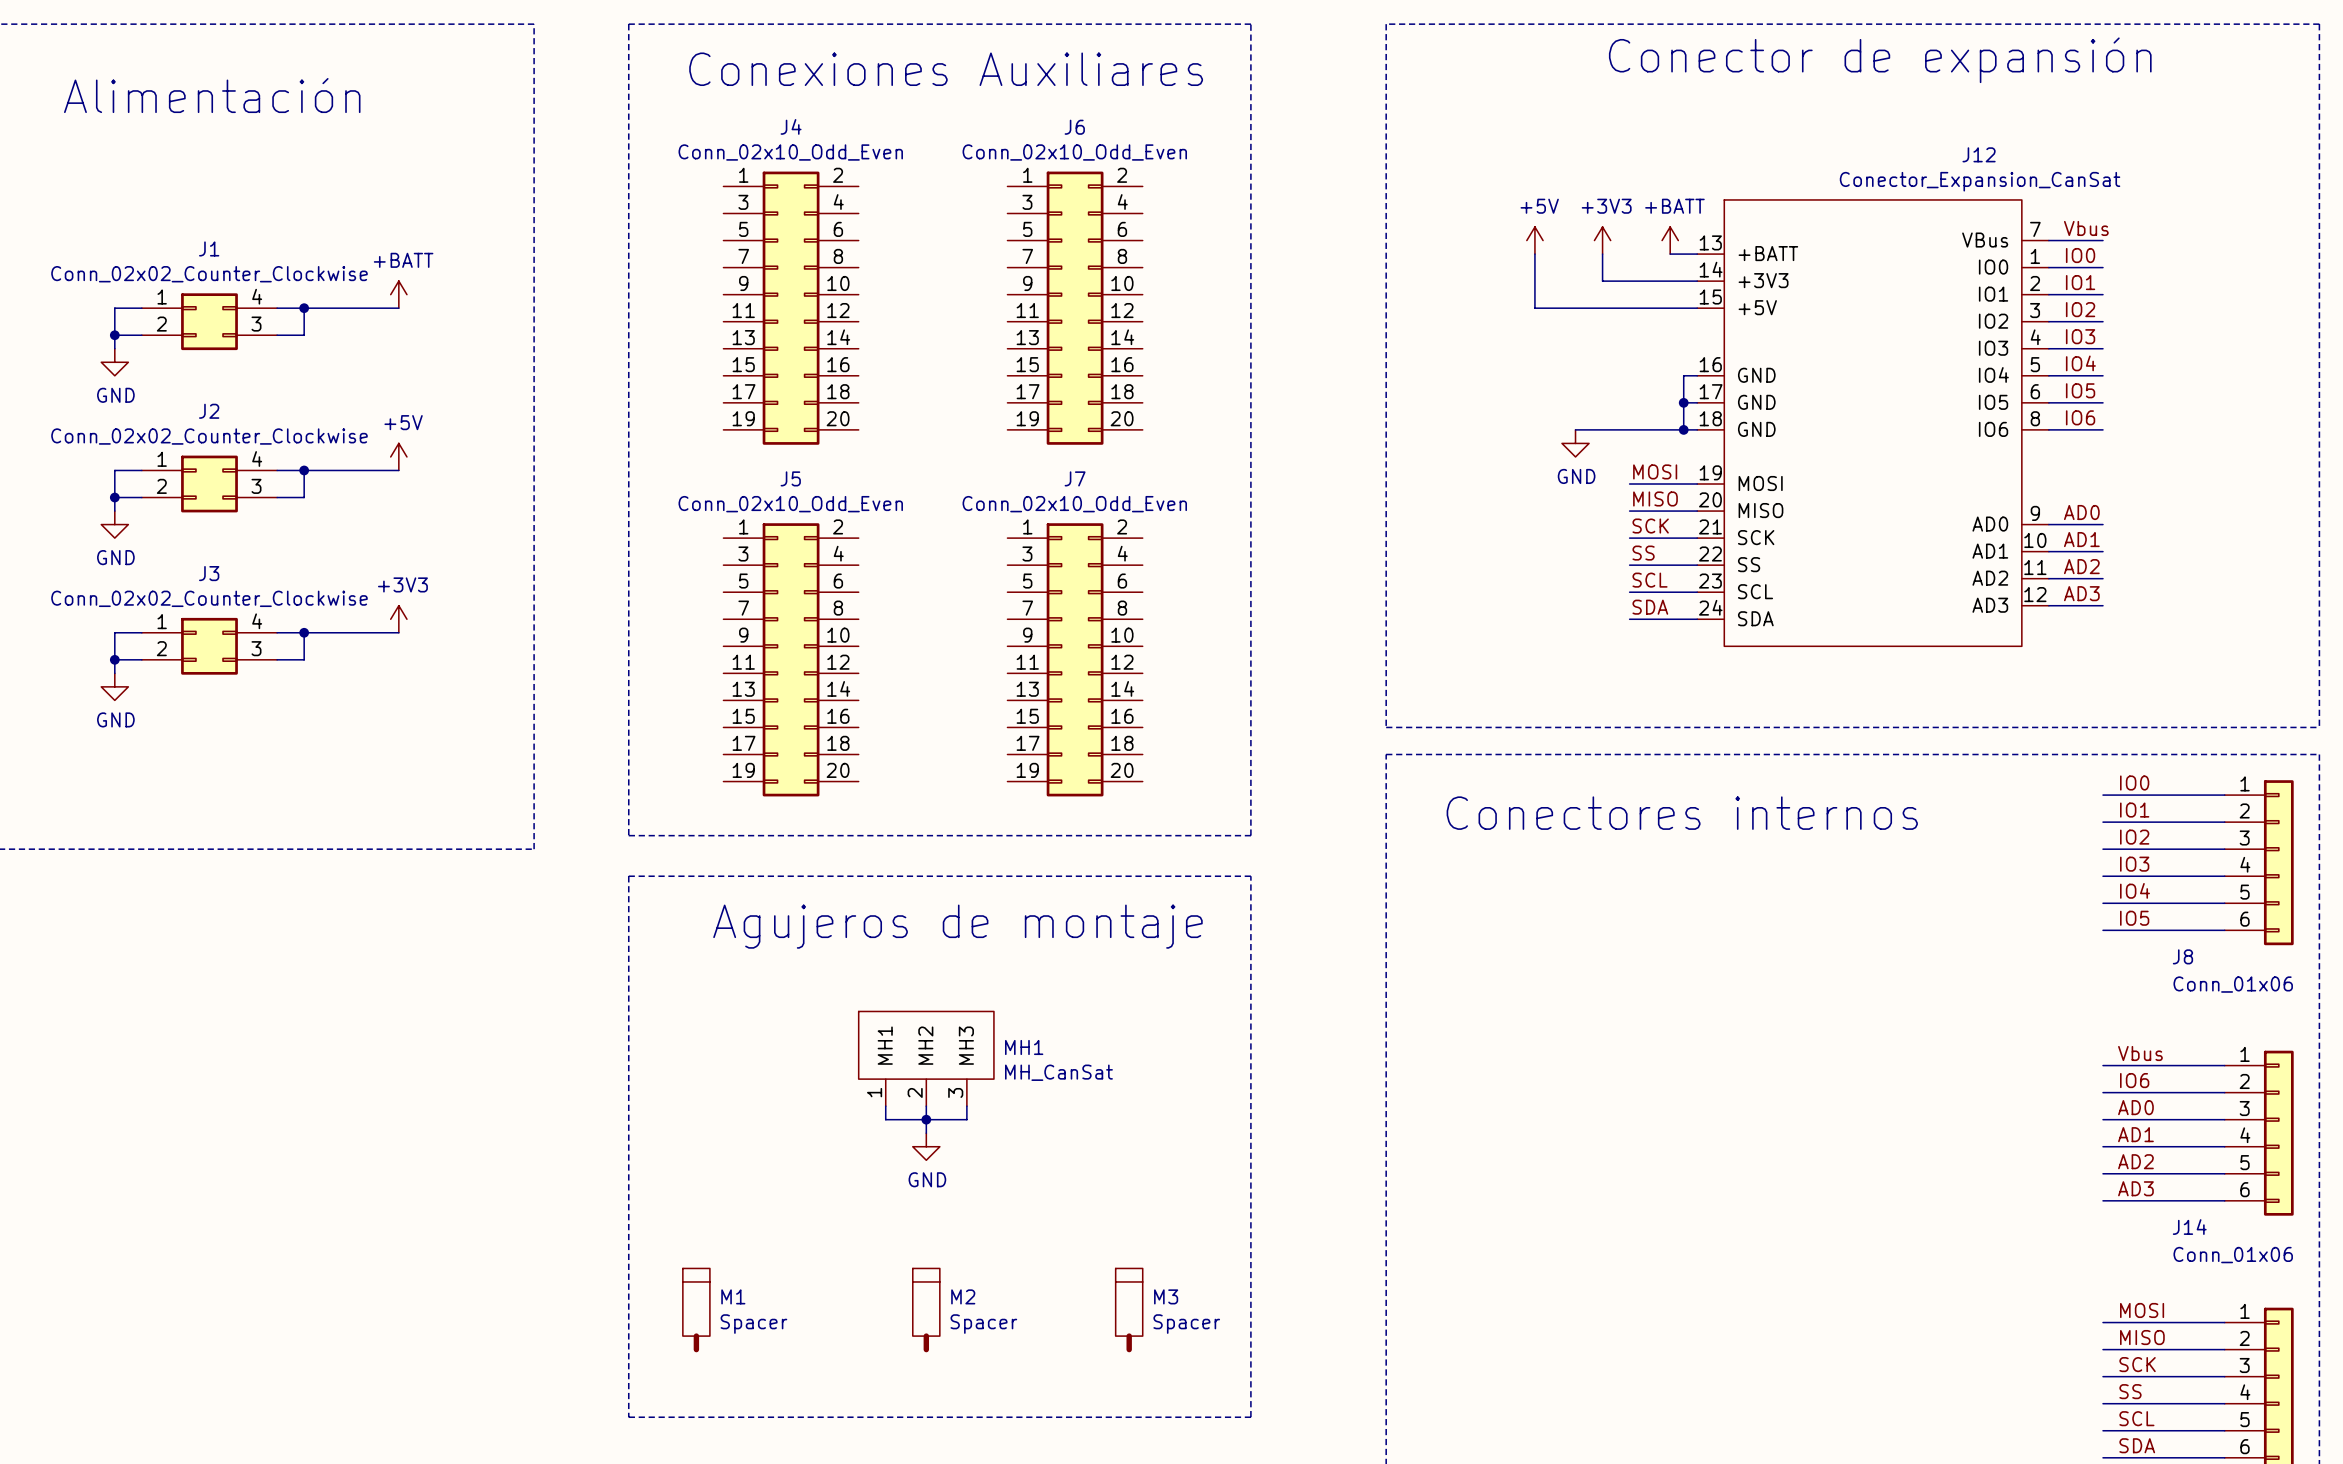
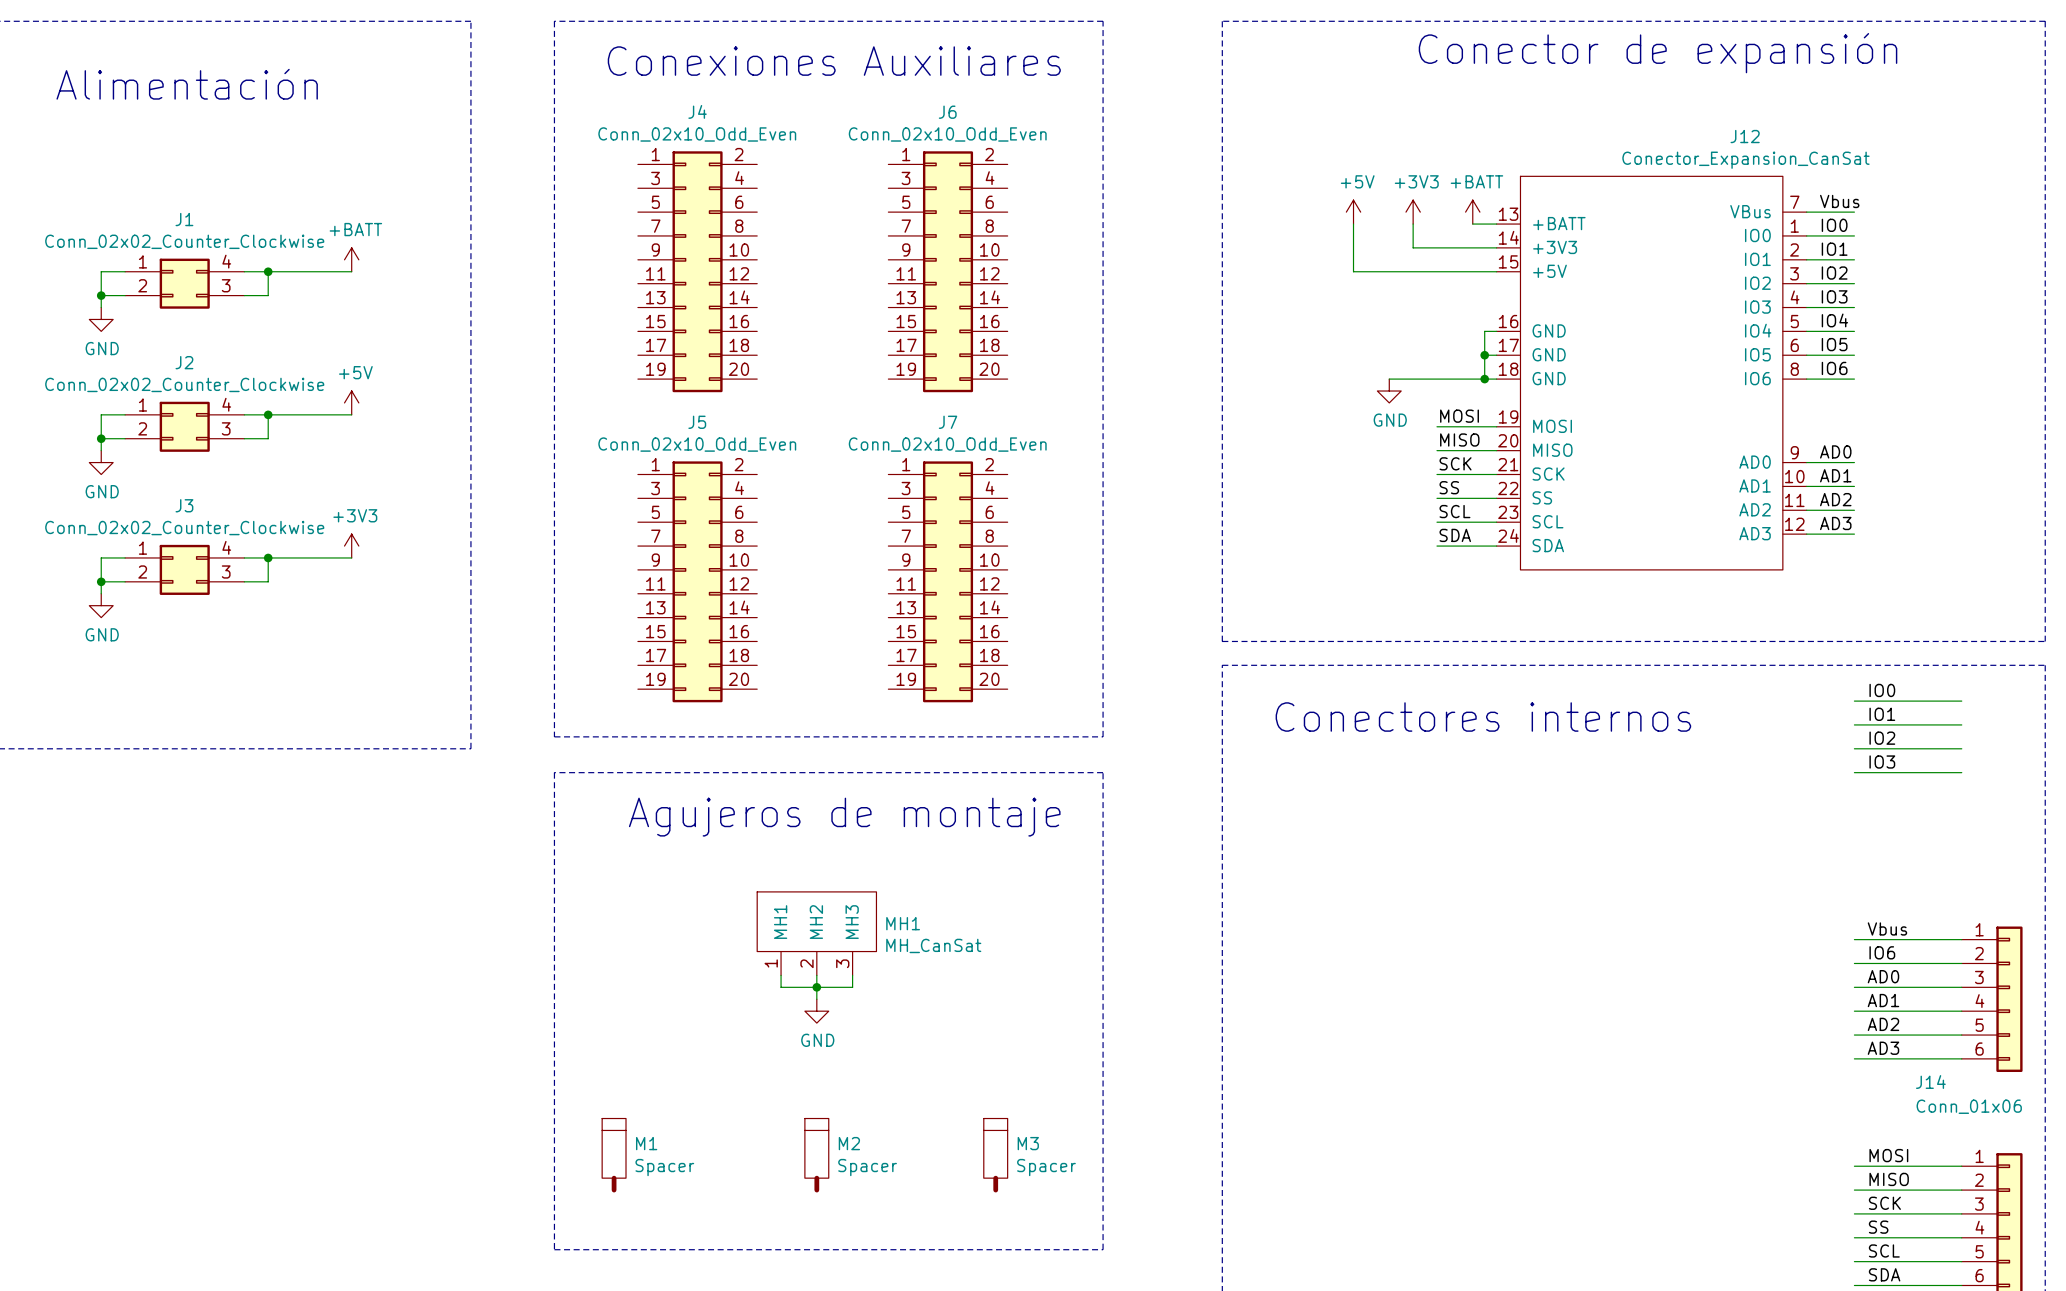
J8: Conn_01x06 (2259, 862) -> none
label: IO4 (2134, 890) -> none
wire: (2103, 903) (2224, 903) -> none
label: IO5 (2134, 918) -> none
wire: (2103, 930) (2224, 930) -> none

